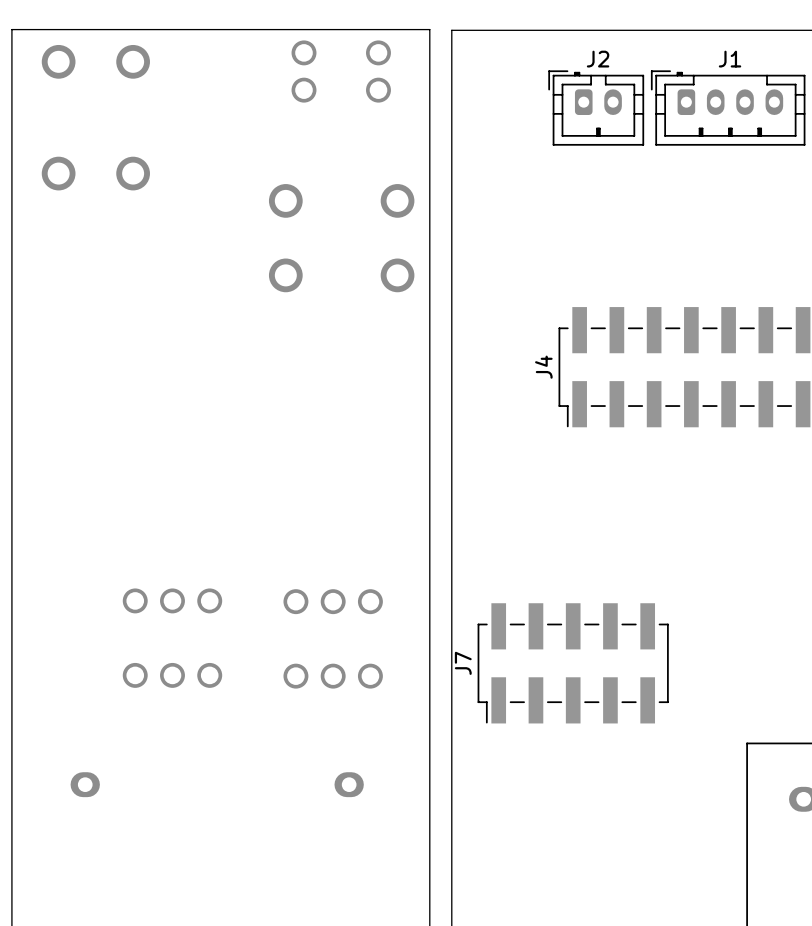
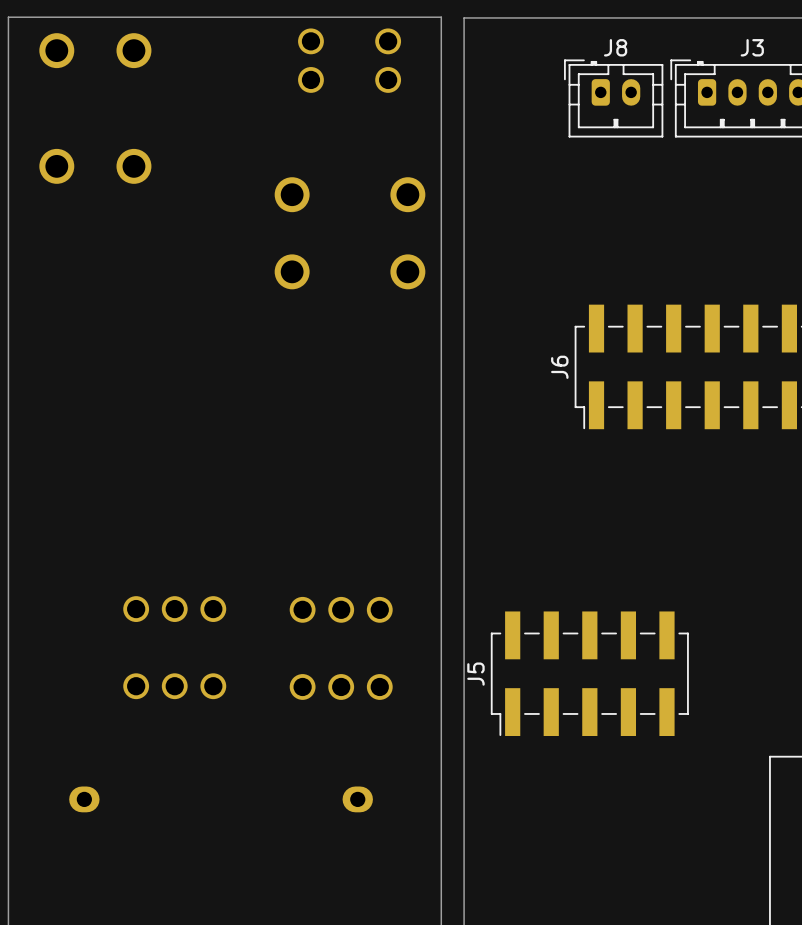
J2 name: J2 (598, 59) -> J8 (615, 47)
J1 name: J1 (730, 59) -> J3 (752, 47)
J4 name: J4 (543, 367) -> J6 (559, 367)
J7 name: J7 (463, 663) -> J5 (475, 674)

